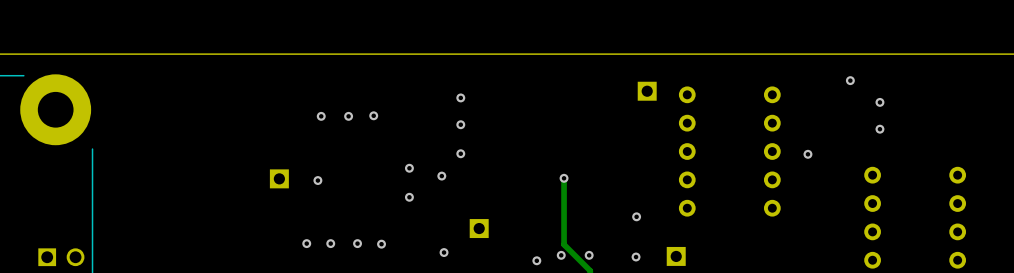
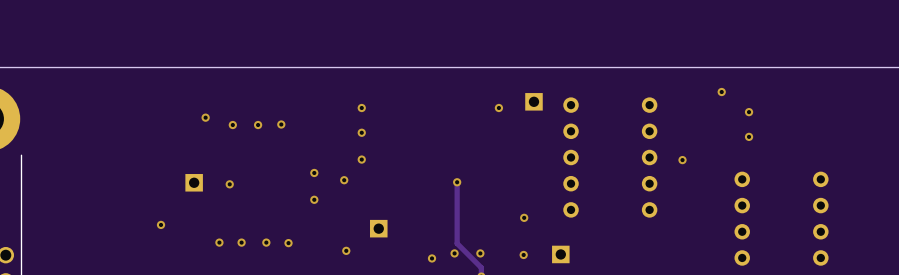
via: none -> (498, 108)
via: none -> (205, 117)
via: none -> (161, 224)

